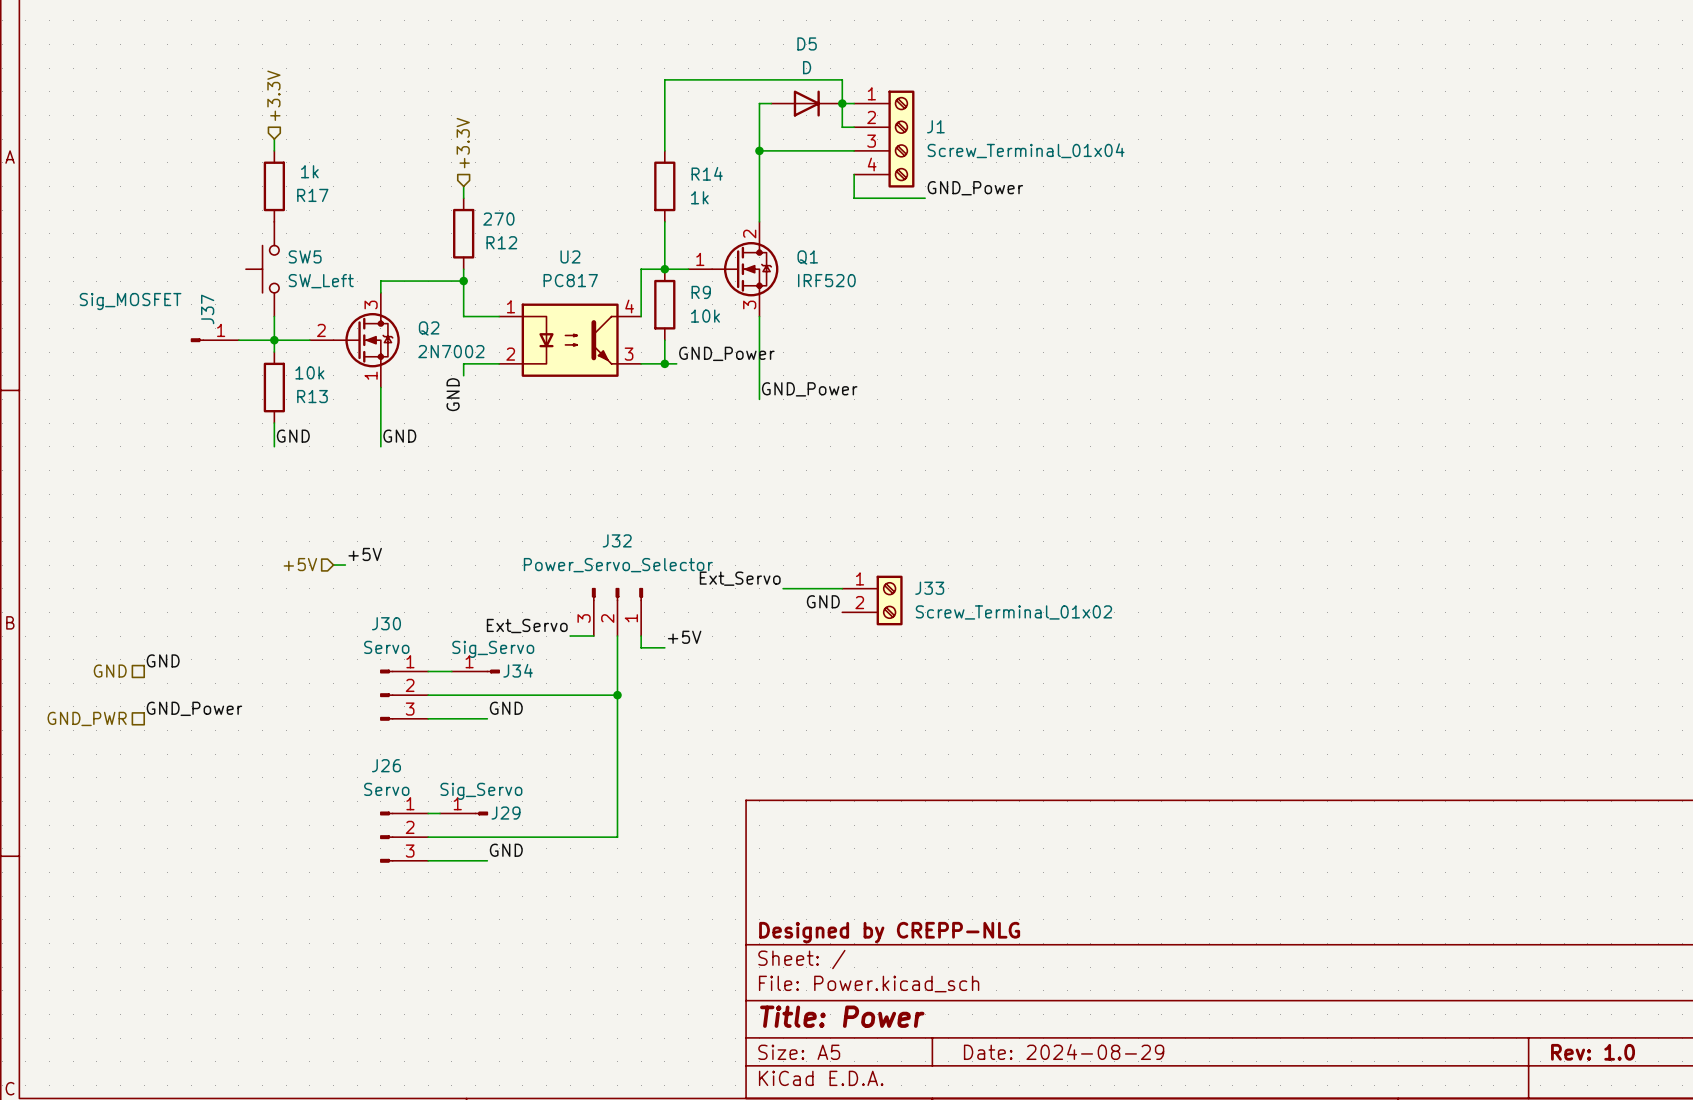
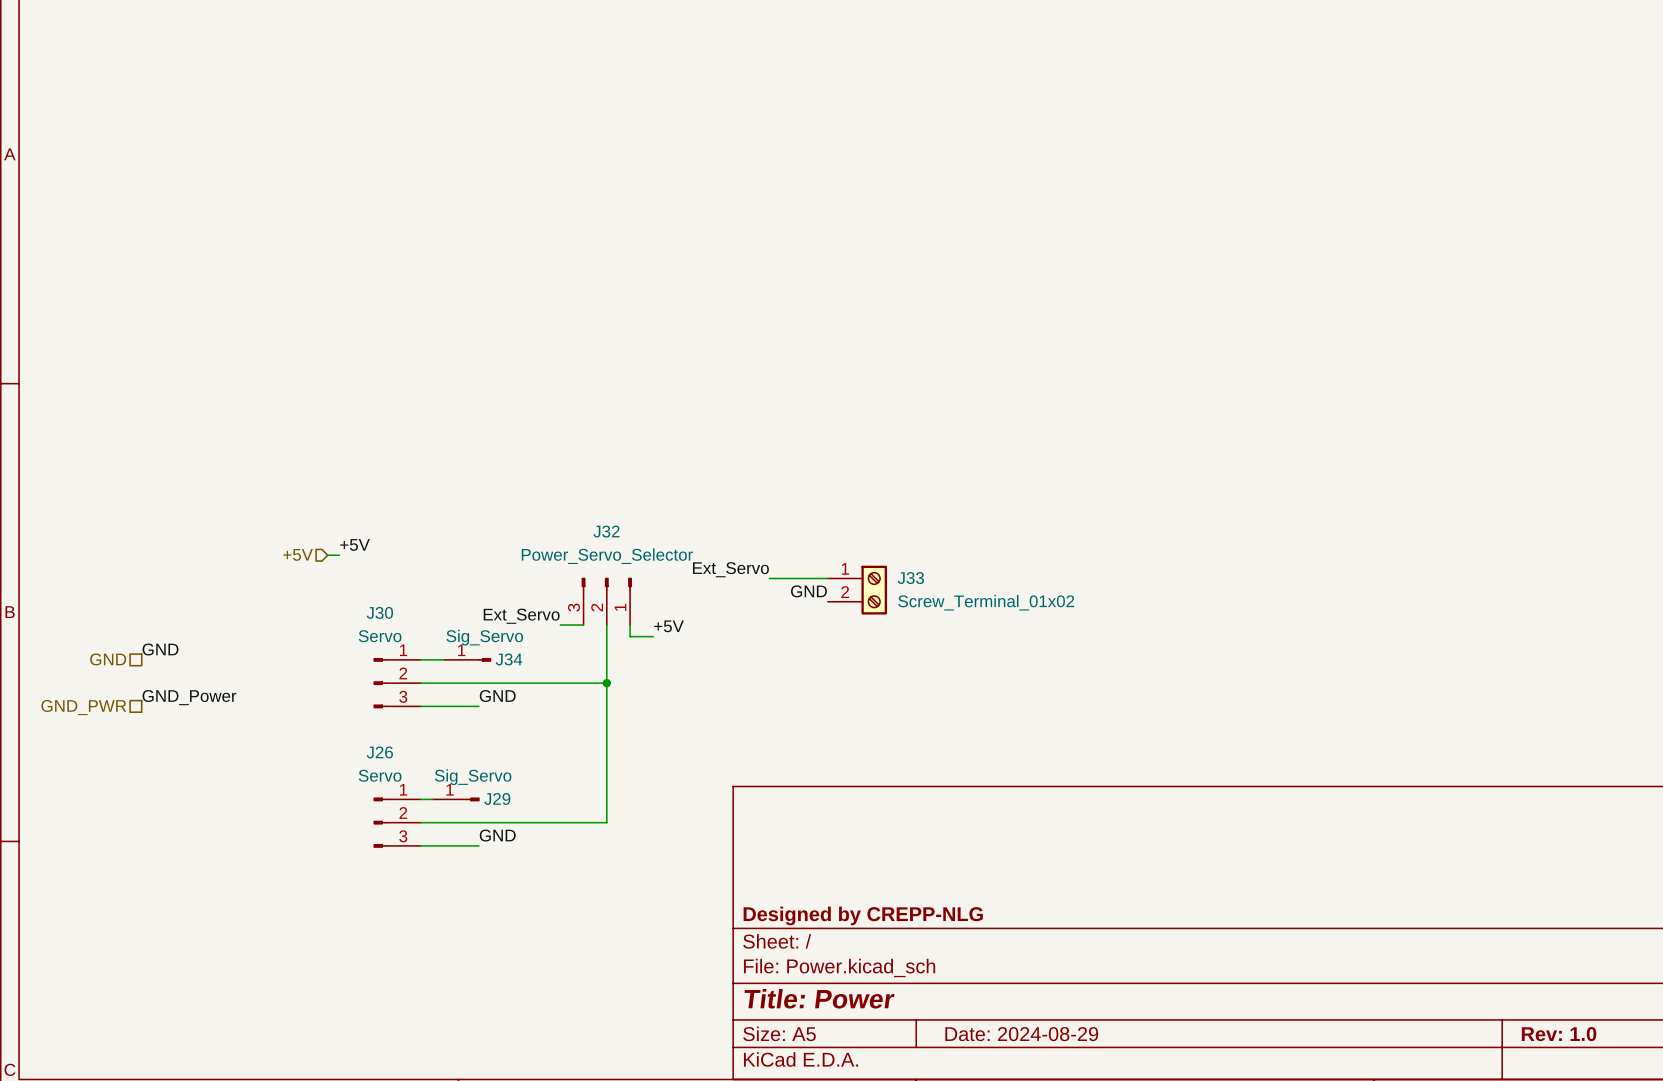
hierarchical label: +3.3V (273, 95) -> none
wire: (771, 103) (759, 103) (759, 221) -> none
D5: D (806, 103) -> none
wire: (842, 103) (854, 103) -> none
junction: (842, 103) -> none
wire: (854, 127) (842, 127) (842, 79) (664, 79) (664, 150) -> none
wire: (274, 139) (274, 150) -> none
J1: Screw_Terminal_01x04 (884, 139) -> none
hierarchical label: +3.3V (463, 143) -> none
wire: (759, 150) (854, 150) -> none
junction: (759, 150) -> none
wire: (854, 174) (854, 198) (925, 198) -> none
R17: 1k (274, 186) -> none
wire: (463, 186) (463, 198) -> none
R14: 1k (664, 186) -> none
label: GND_Power (975, 188) -> none
wire: (664, 221) (664, 269) -> none
R12: 270 (463, 233) -> none
SW5: SW_Left (262, 269) -> none
wire: (463, 269) (463, 316) (499, 316) -> none
junction: (664, 269) -> none
wire: (688, 269) (641, 269) (641, 316) -> none
Q1: IRF520 (733, 269) -> none
wire: (463, 281) (380, 281) (380, 292) -> none
junction: (463, 281) -> none
R9: 10k (664, 304) -> none
wire: (274, 316) (274, 352) -> none
wire: (759, 316) (759, 399) -> none
J37: Sig_MOSFET (214, 340) -> none
wire: (238, 340) (309, 340) -> none
junction: (274, 340) -> none
Q2: 2N7002 (354, 340) -> none
U2: PC817 (570, 340) -> none
wire: (664, 340) (664, 363) -> none
label: GND_Power (726, 353) -> none
wire: (499, 363) (463, 363) (463, 375) -> none
wire: (641, 363) (676, 363) -> none
junction: (664, 363) -> none
R13: 10k (274, 387) -> none
wire: (380, 387) (380, 446) -> none
label: GND_Power (809, 389) -> none
label: GND (453, 394) -> none
wire: (274, 423) (274, 446) -> none
label: GND (293, 436) -> none
label: GND (399, 436) -> none

